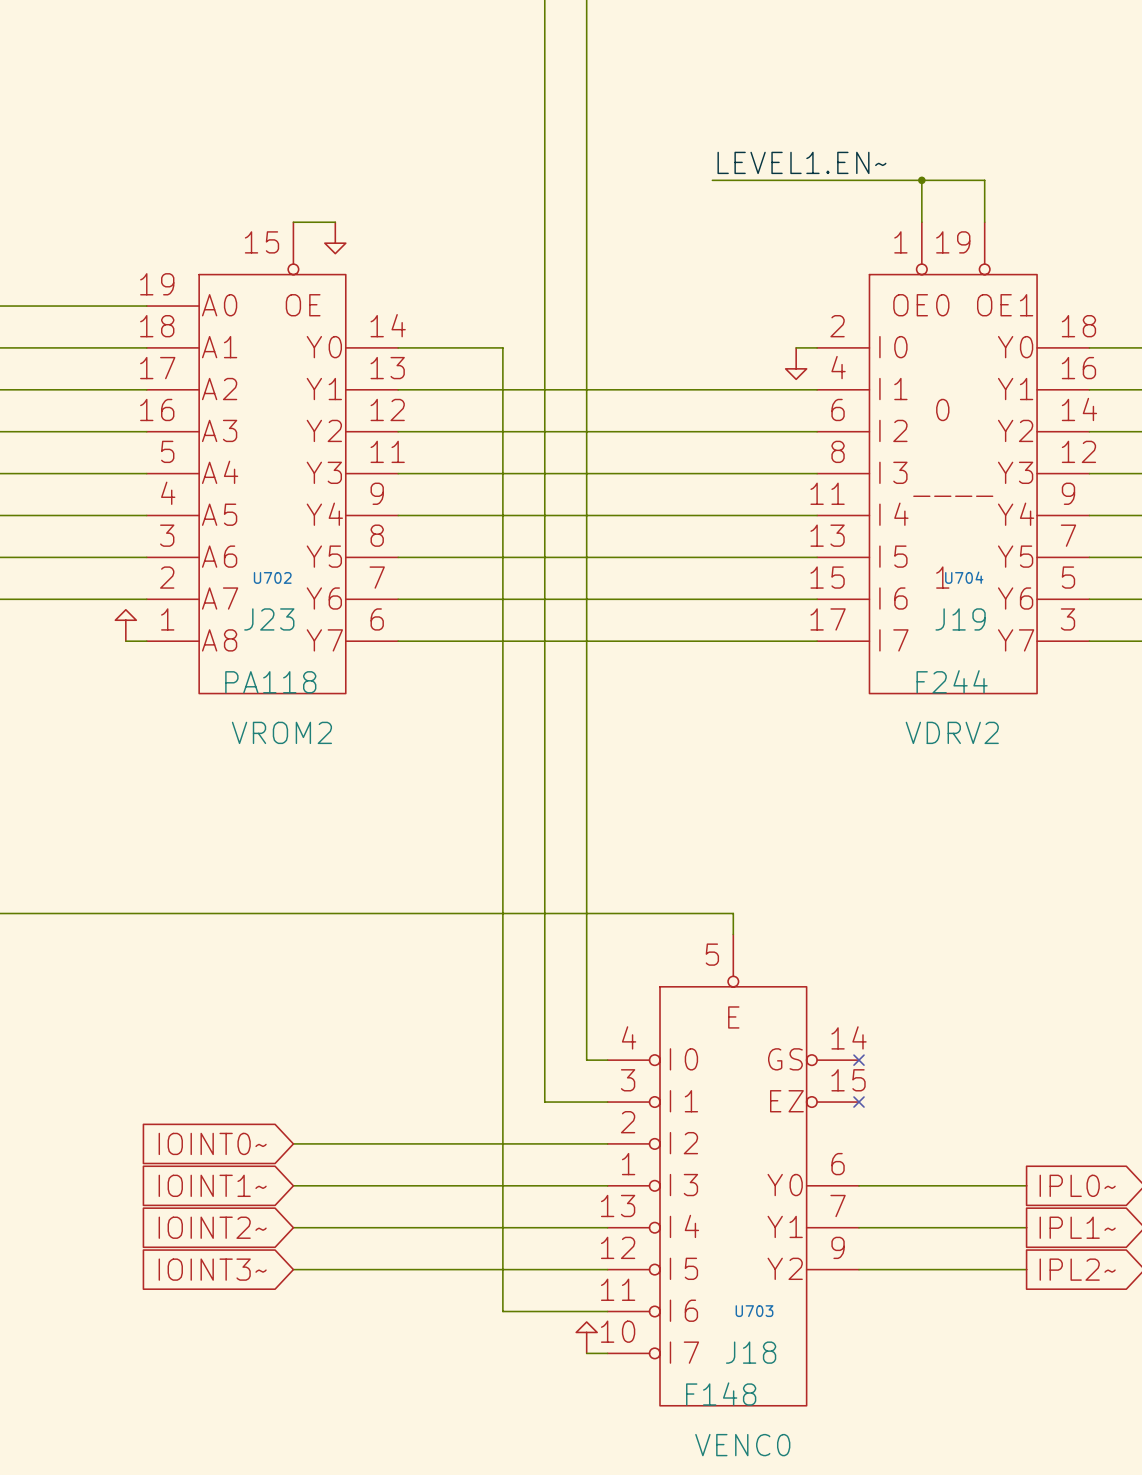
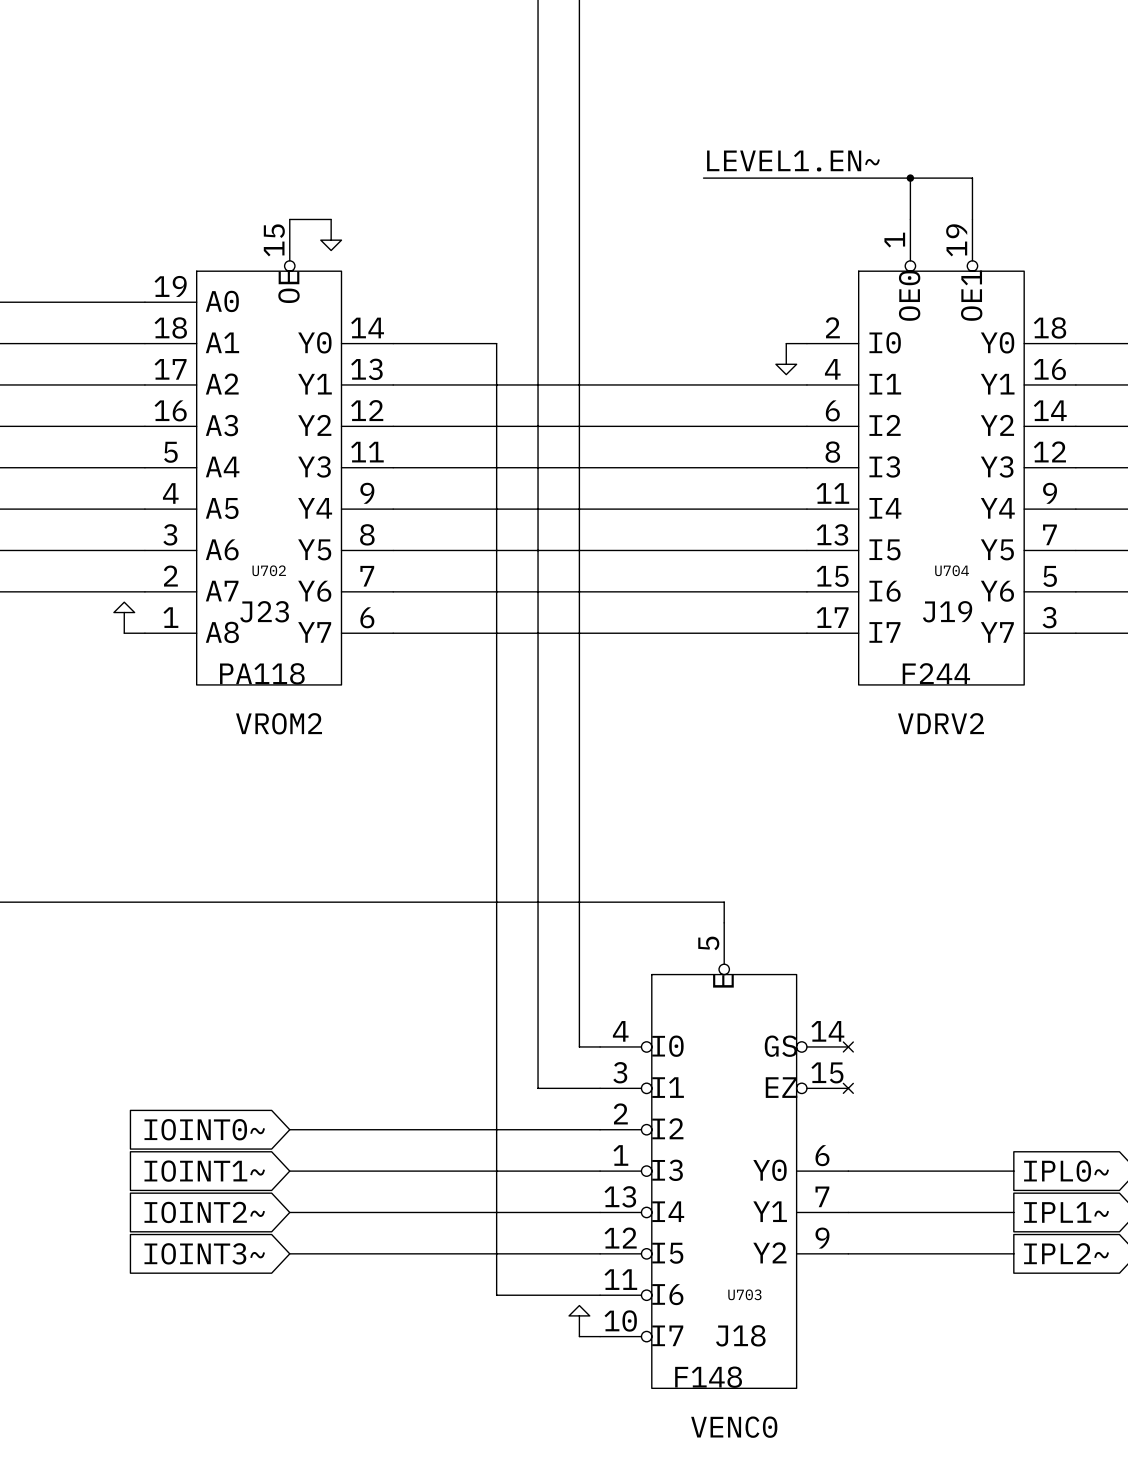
U702 symbol: [146, 222, 399, 694] -> [144, 219, 394, 685]
U704 symbol: [817, 222, 1090, 694] -> [806, 219, 1076, 685]
U703 symbol: [607, 934, 860, 1406] -> [600, 922, 849, 1389]

